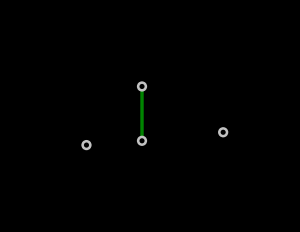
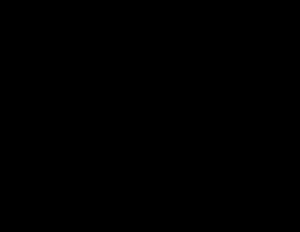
track: (142, 86) (142, 140) -> none
via: (142, 86) -> none
via: (223, 132) -> none
via: (142, 140) -> none
via: (86, 145) -> none

